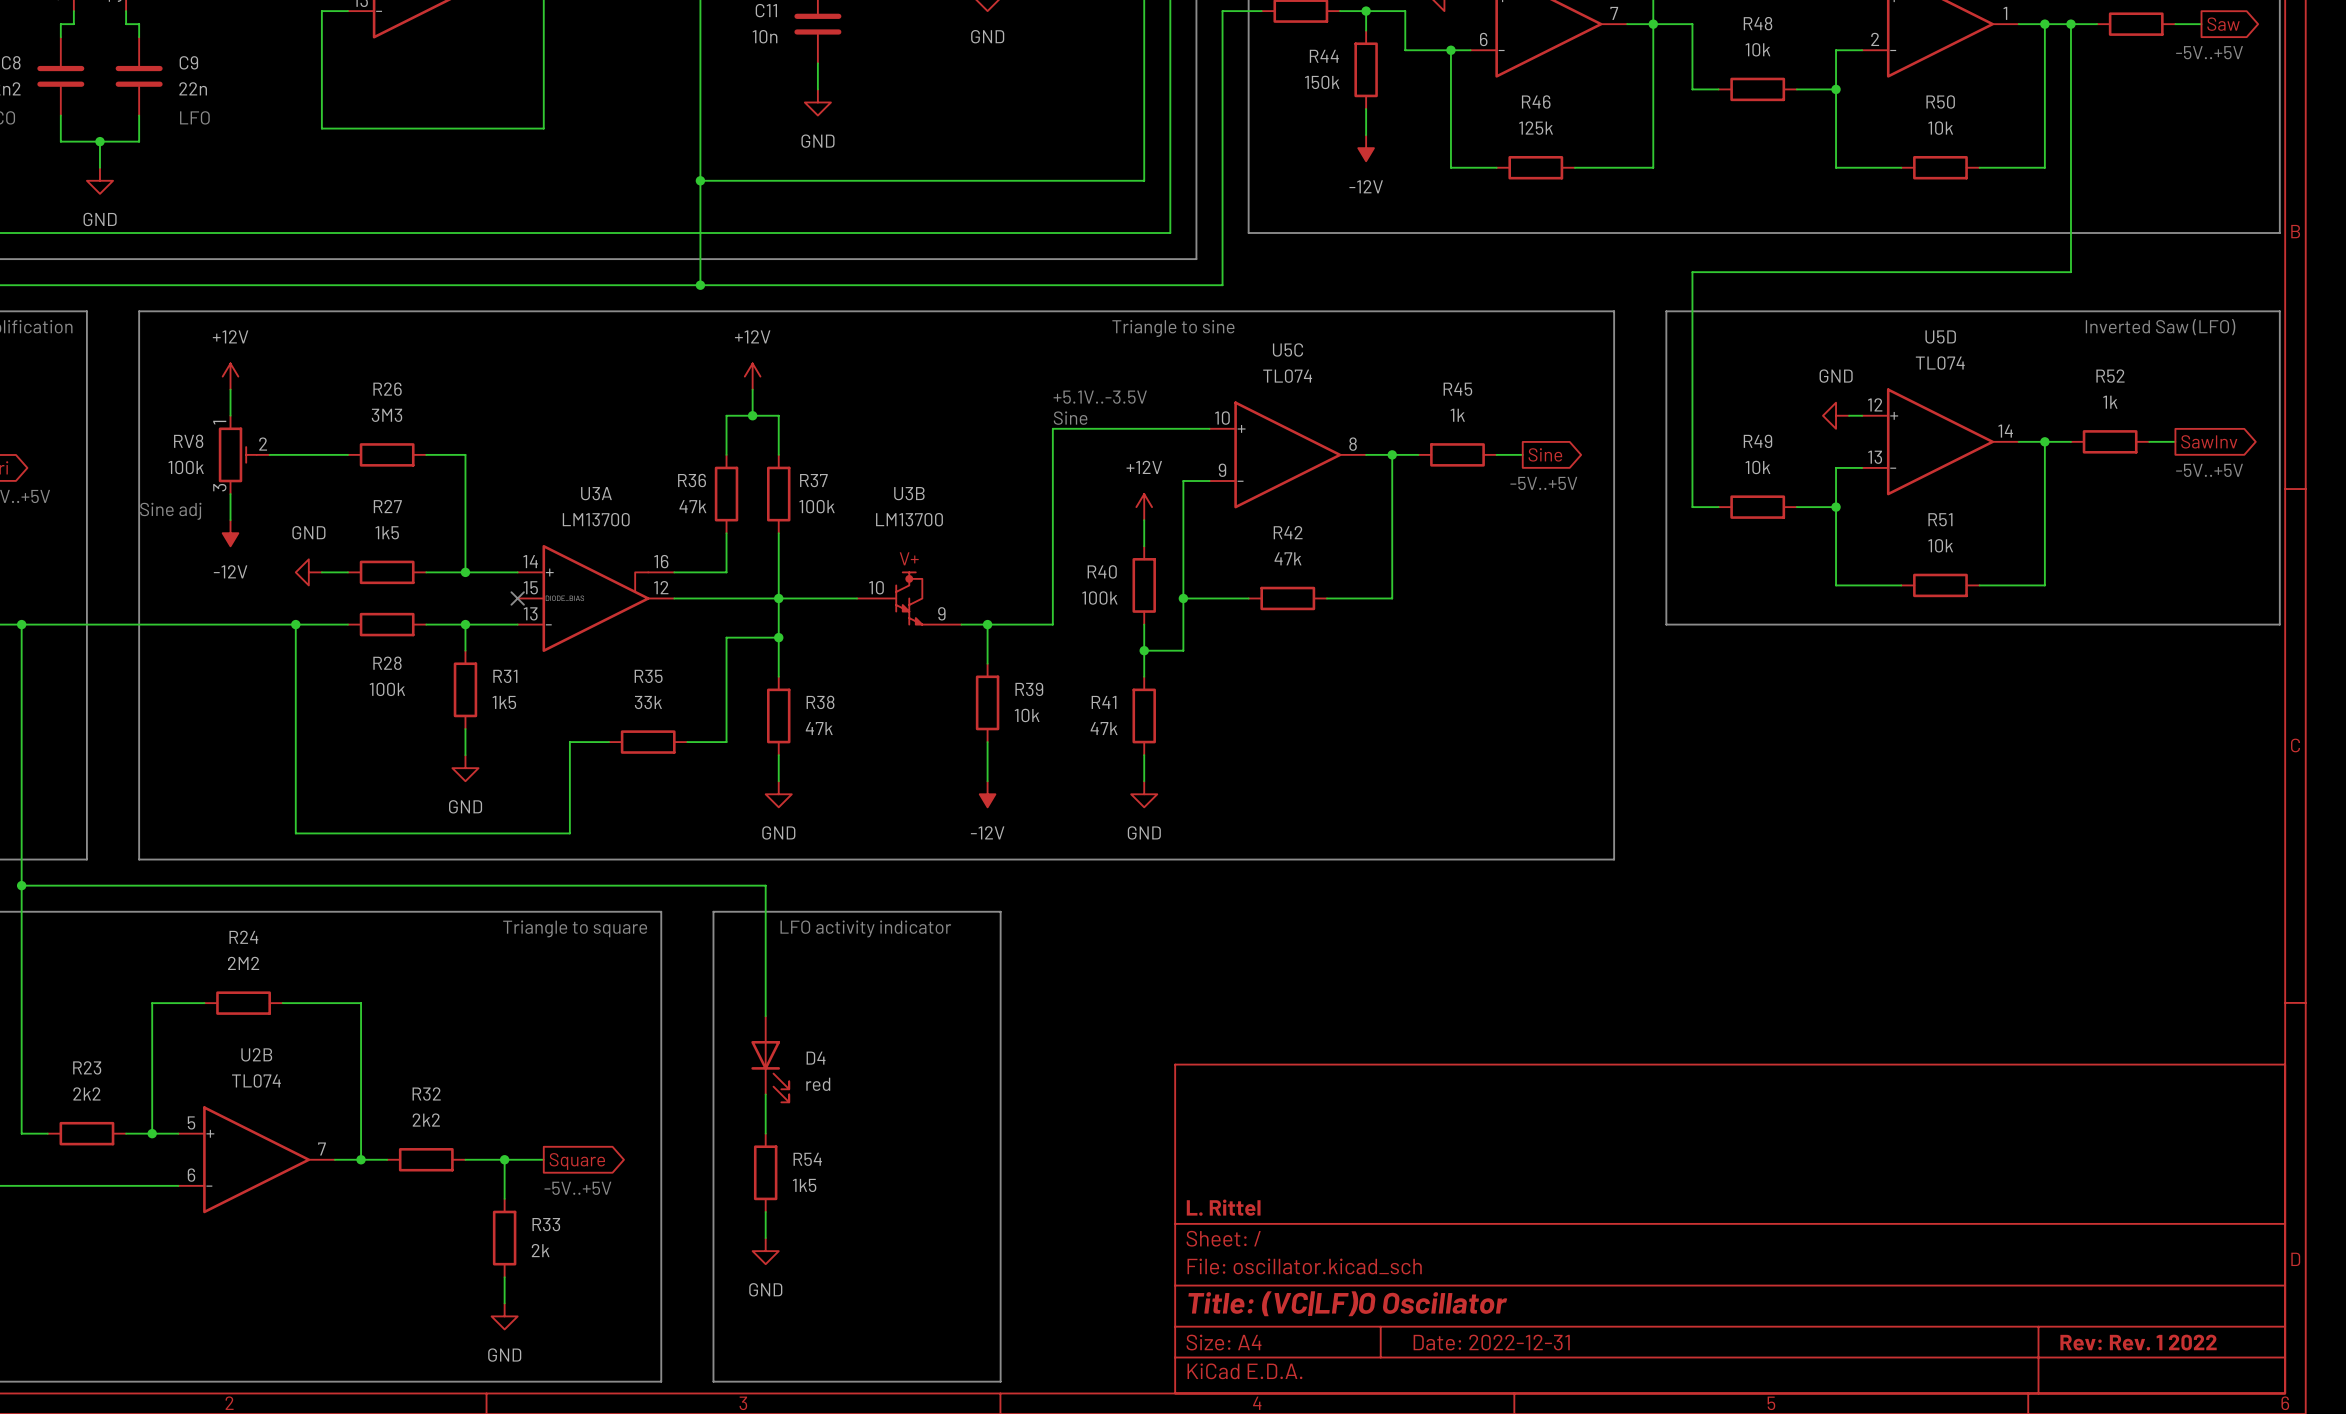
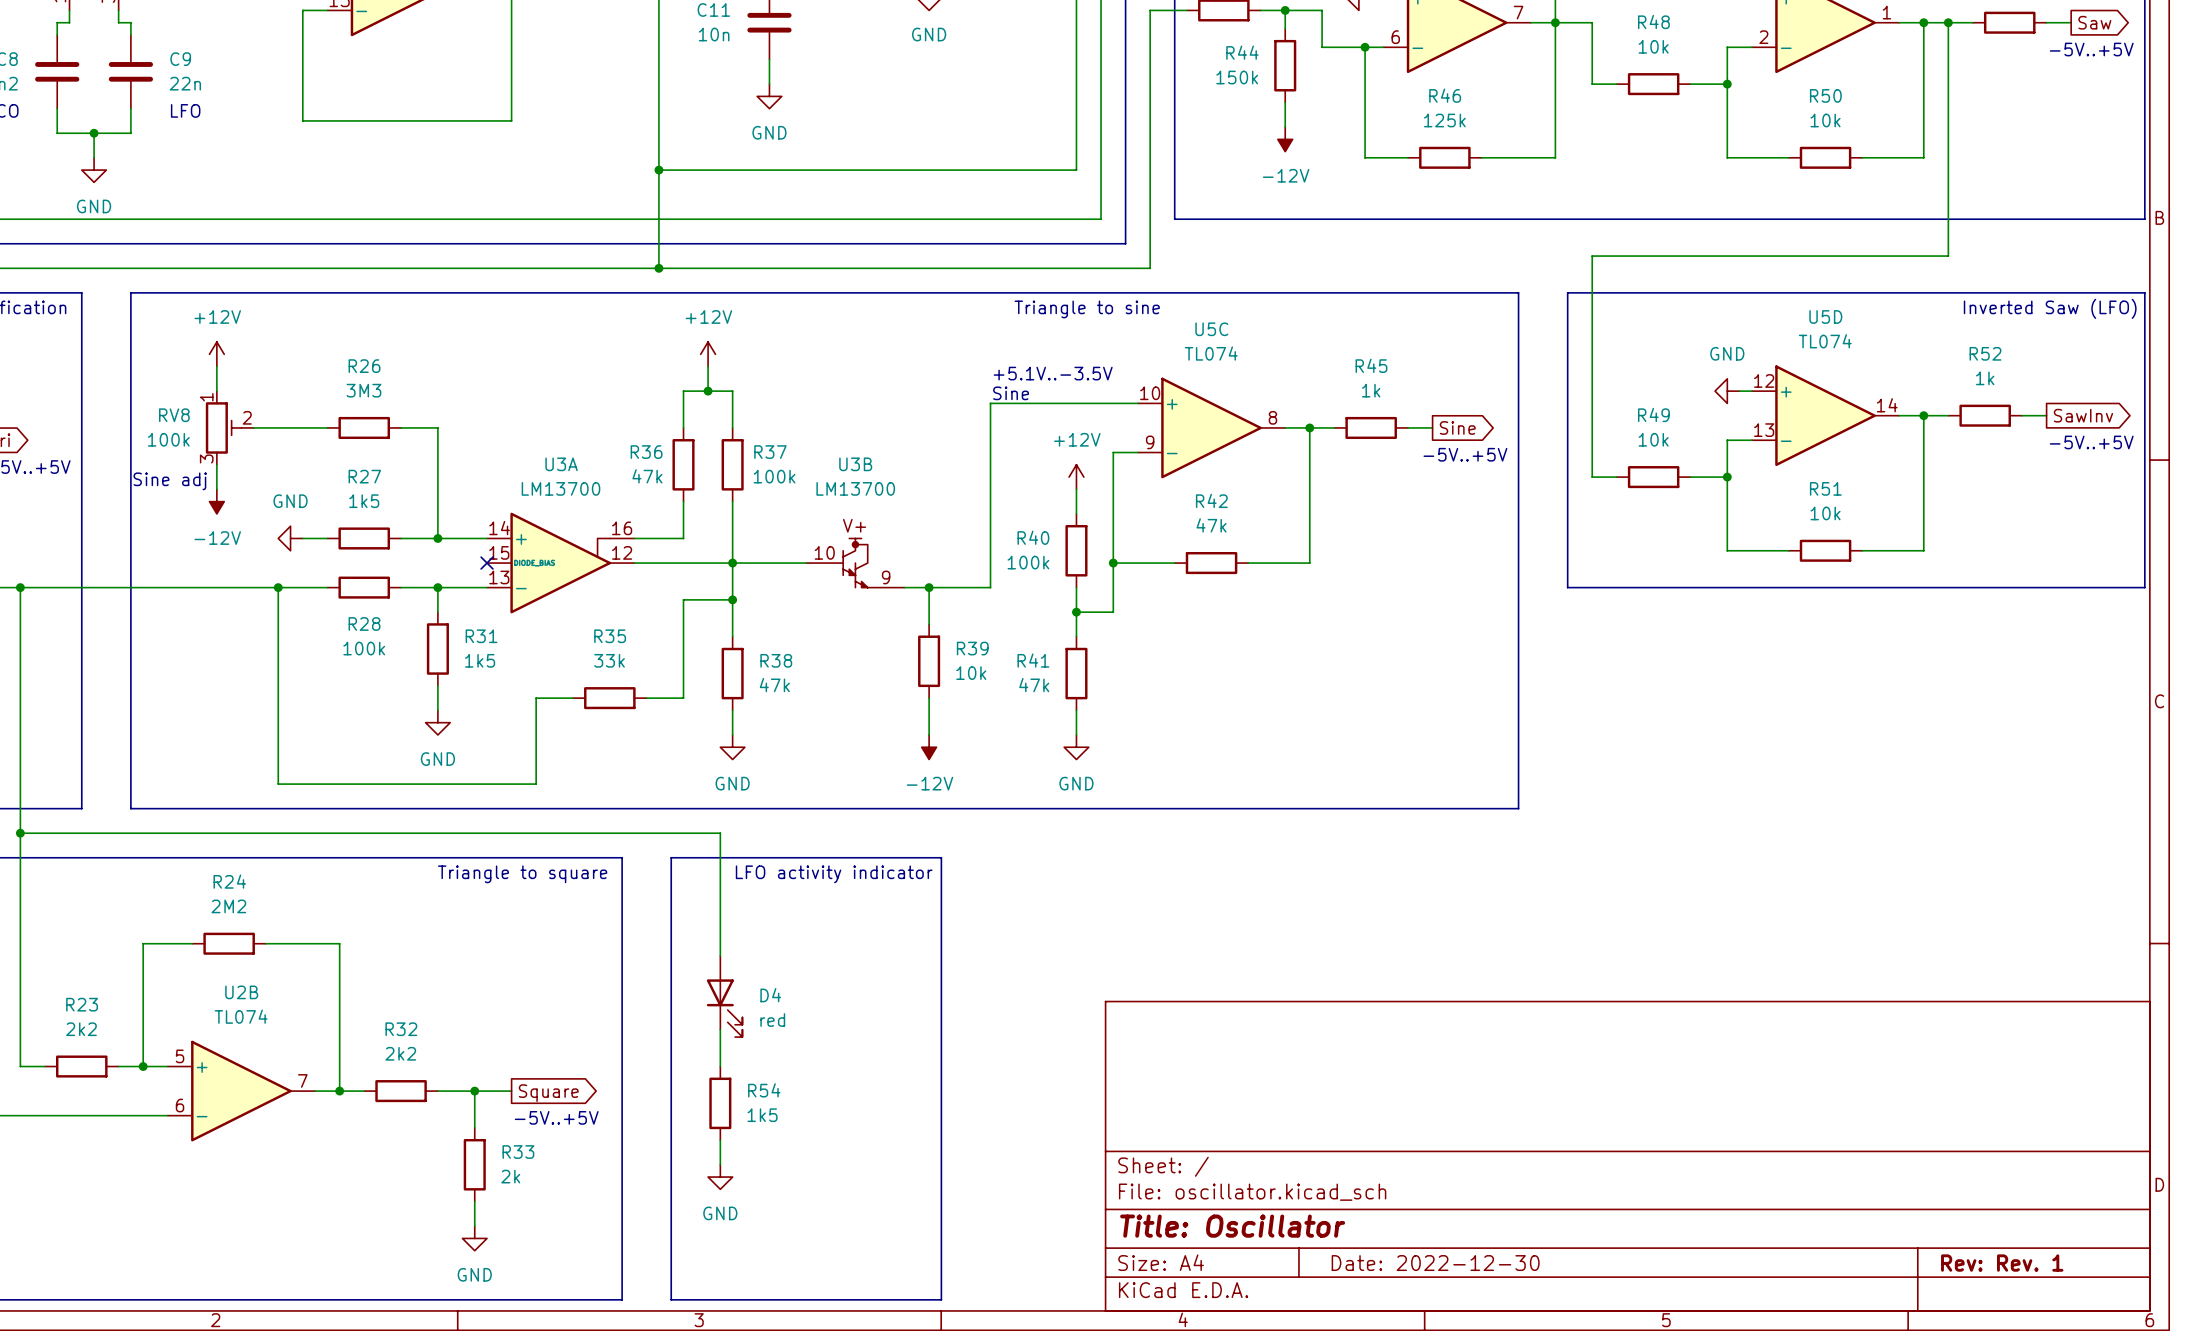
title block: L. Rittel (1223, 1207) -> none
title block: Title: (VC|LF)O Oscillator (1347, 1303) -> Title: Oscillator (1232, 1226)
title block: Date: 2022-12-31 (1491, 1342) -> Date: 2022-12-30 (1435, 1263)
title block: Rev: Rev. 1 2022 (2138, 1342) -> Rev: Rev. 1 (2002, 1263)

